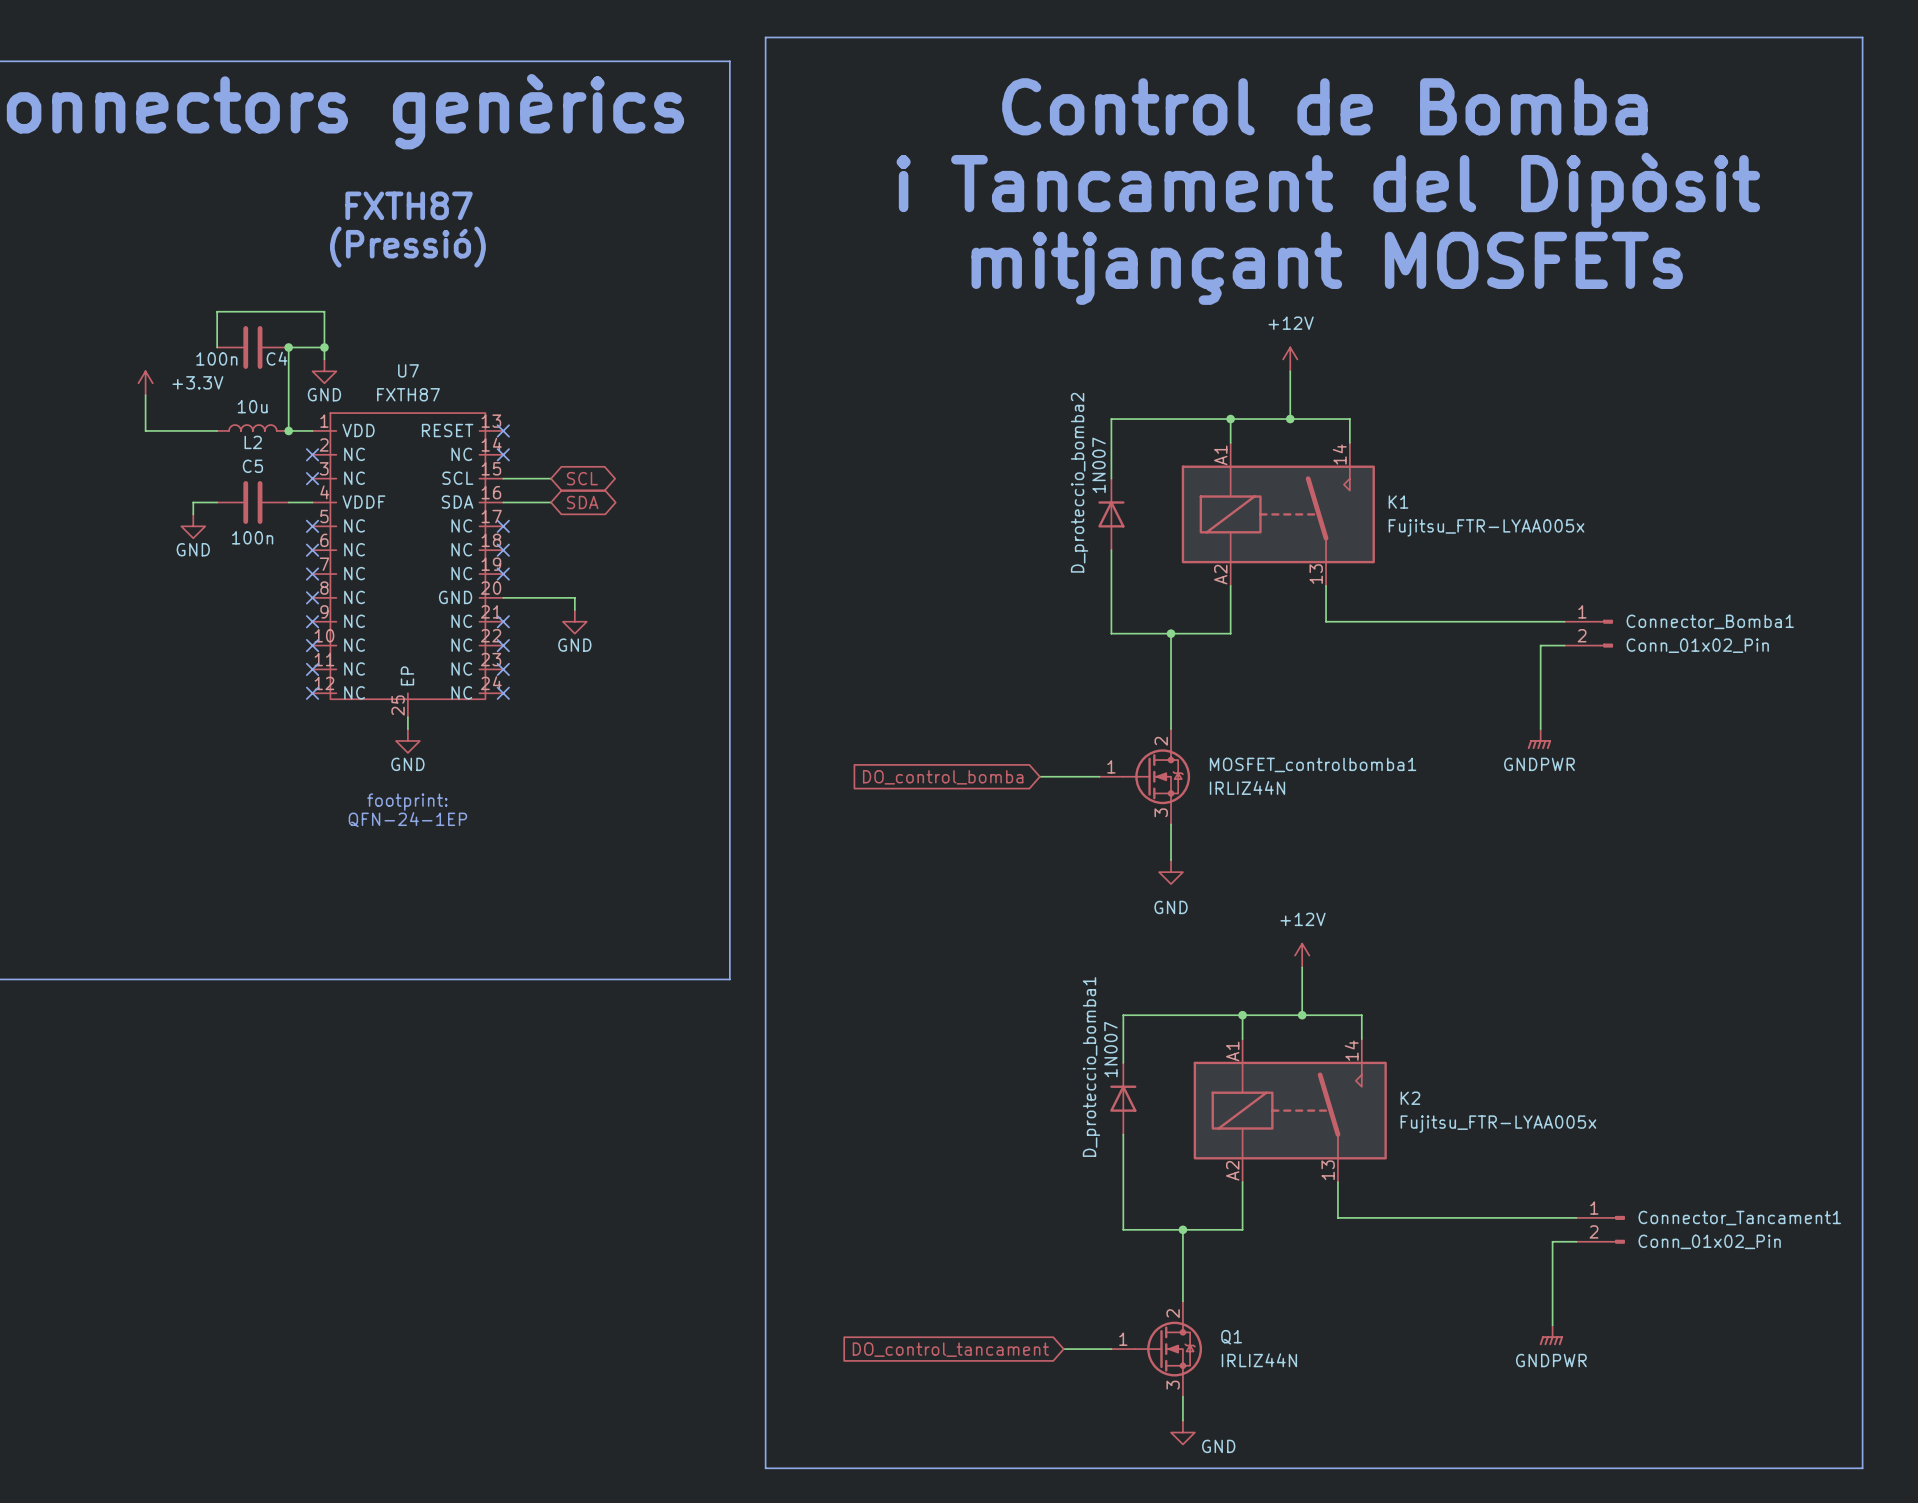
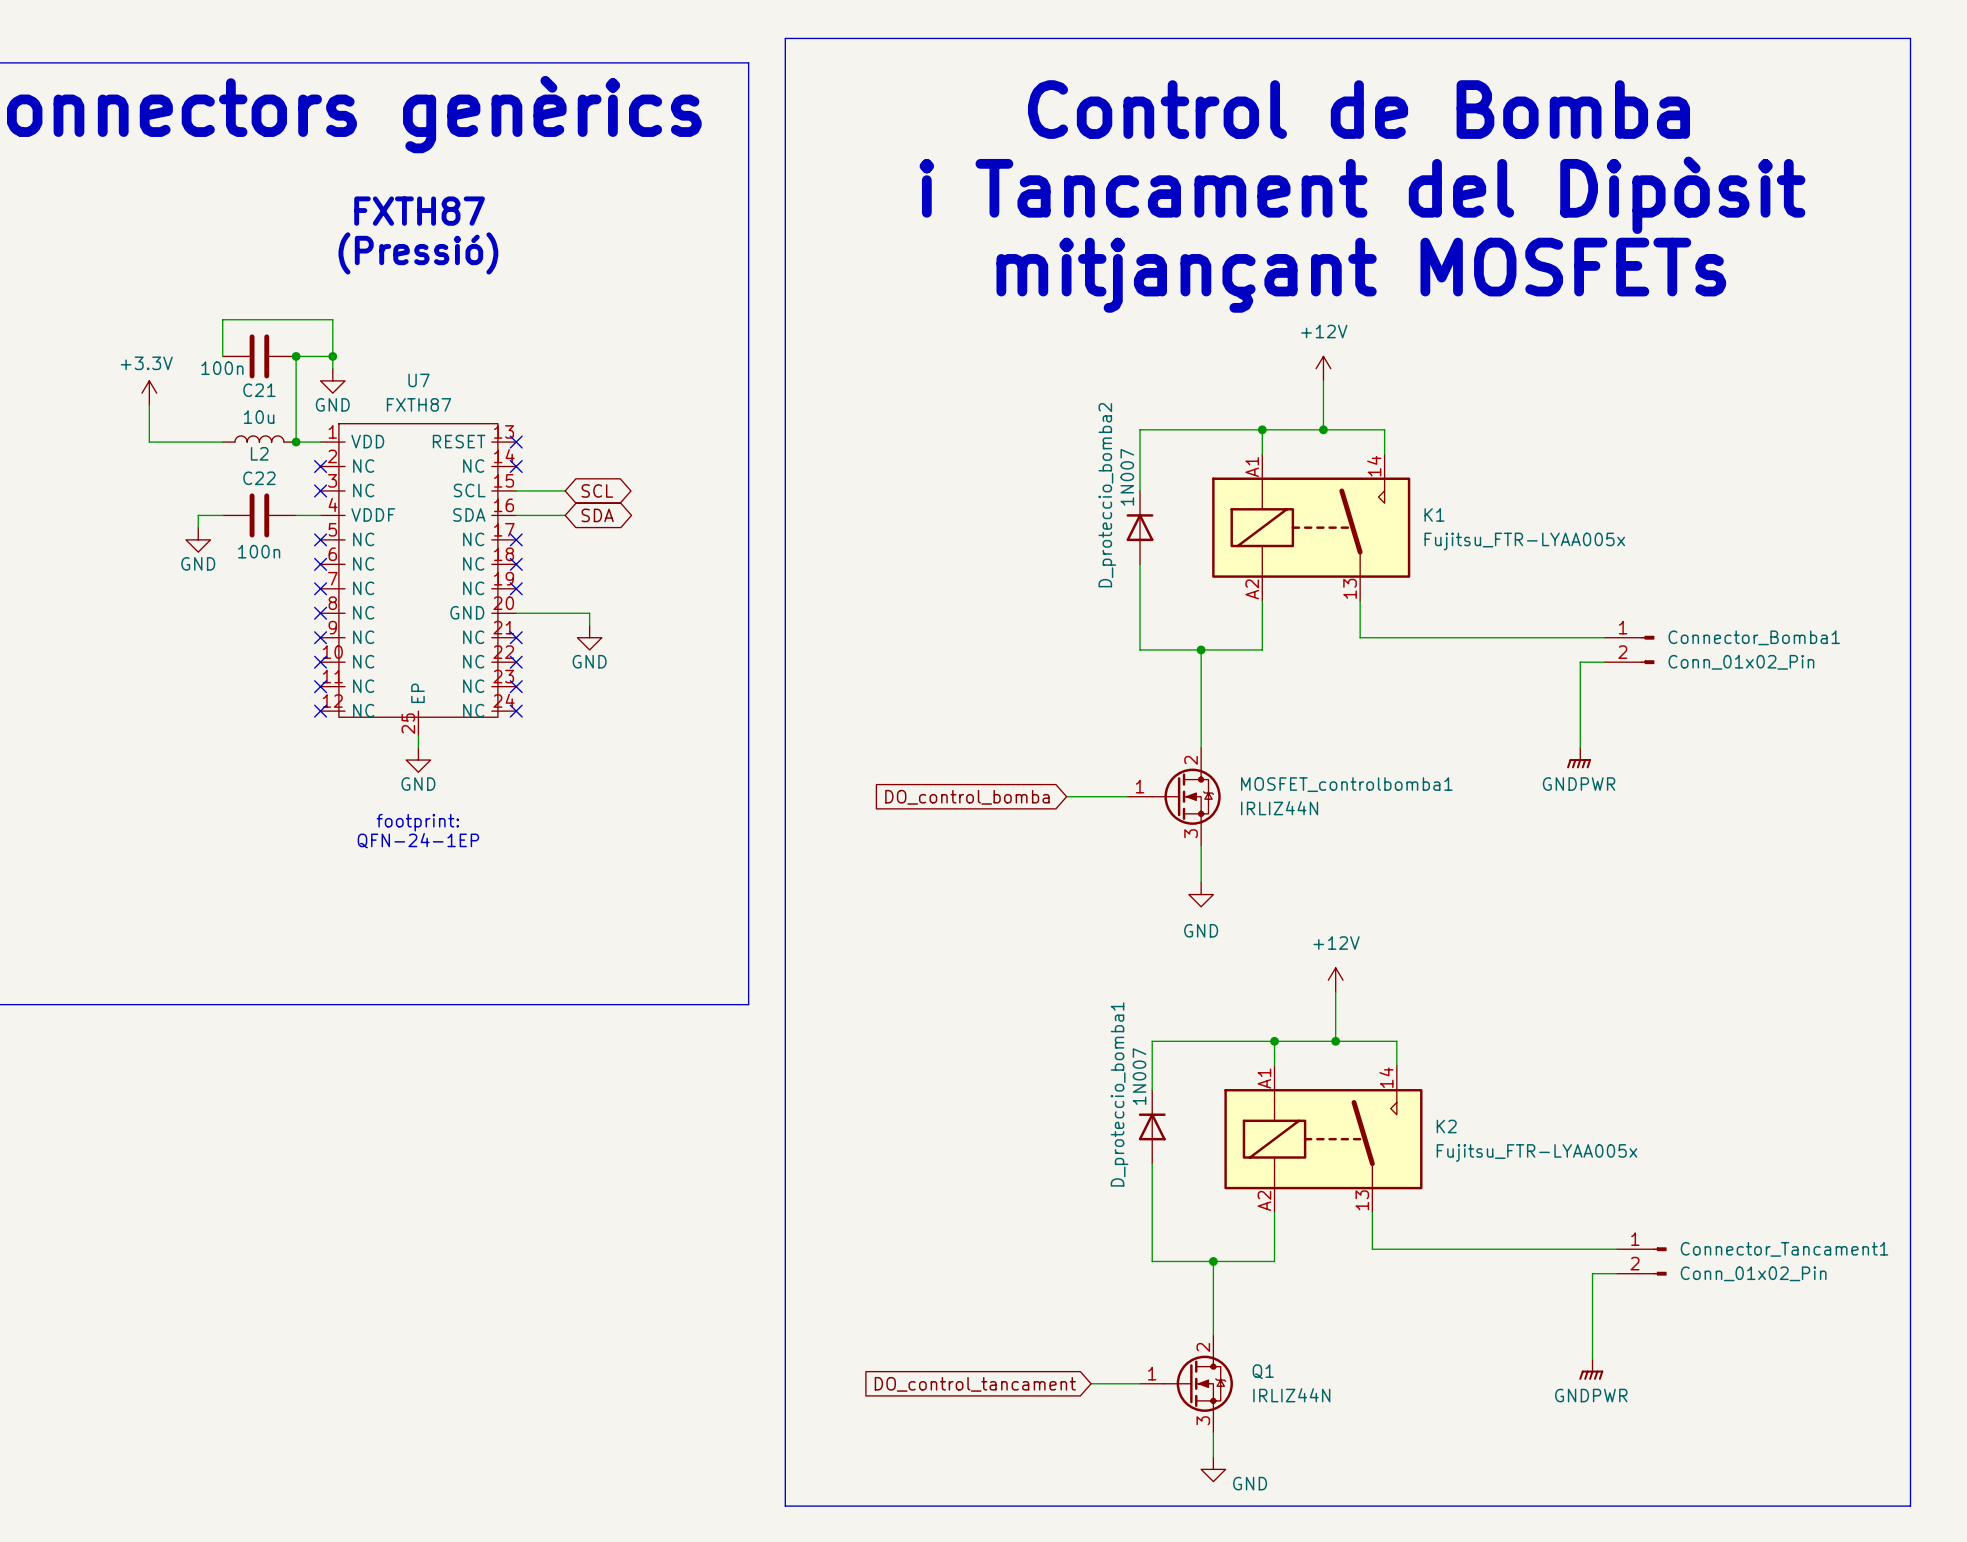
C4 name: C4 (277, 358) -> C21 (259, 390)
power symbol text position: +3.3V (197, 382) -> +3.3V (146, 363)
C5 name: C5 (252, 466) -> C22 (259, 478)

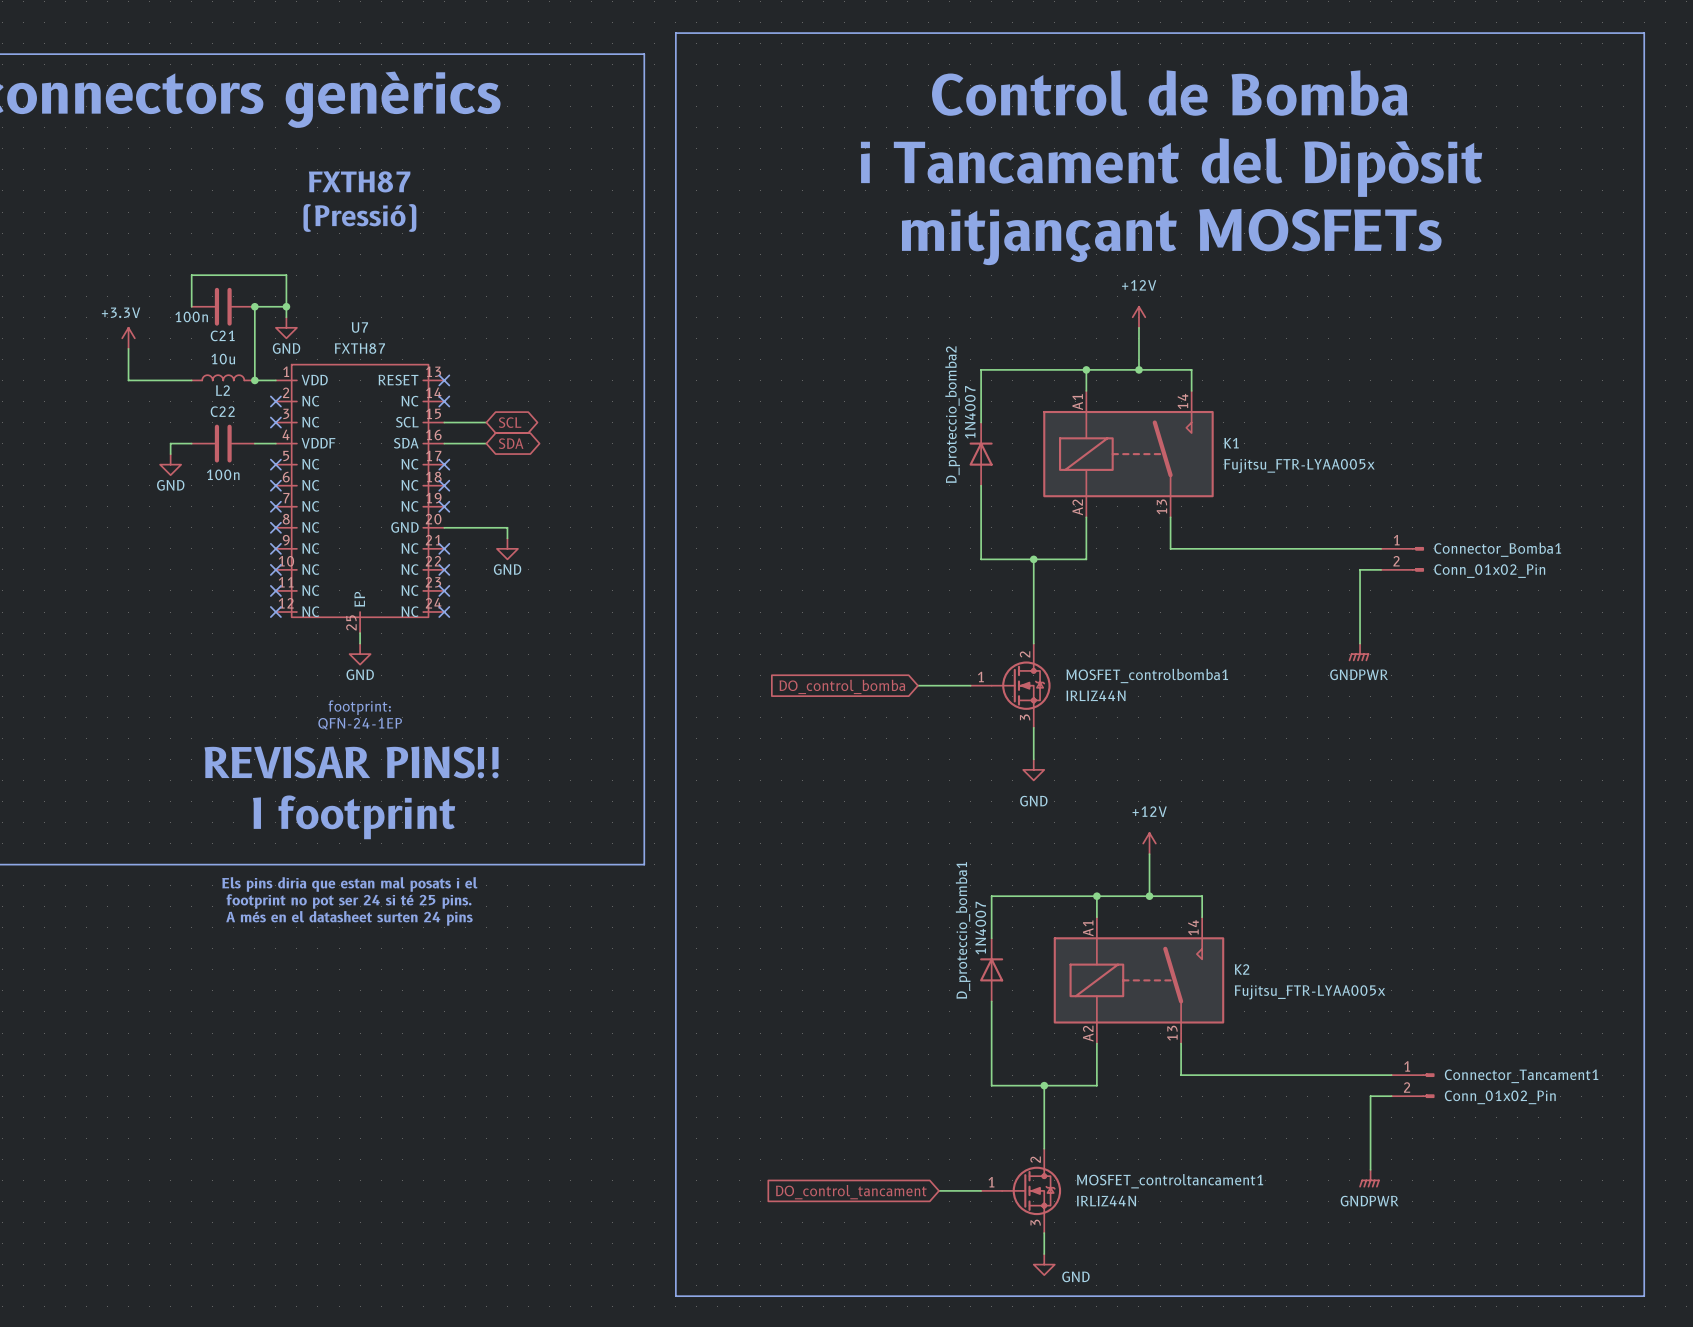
D_proteccio_bomba2 value: 1N007 (1127, 477) -> 1N4007 (970, 412)
text: none -> REVISAR PINS!! (351, 762)
text: none -> I footprint (354, 817)
text: none -> Els pins diria que estan mal posats i el (349, 884)
text: none -> footprint no pot ser 24 si té 25 pins. (349, 901)
text: none -> A més en el datasheet surten 24 pins (349, 918)
D_proteccio_bomba1 value: 1N007 (1139, 1076) -> 1N4007 (980, 928)
Q1 name: Q1 (1263, 1371) -> MOSFET_controltancament1 (1170, 1181)

